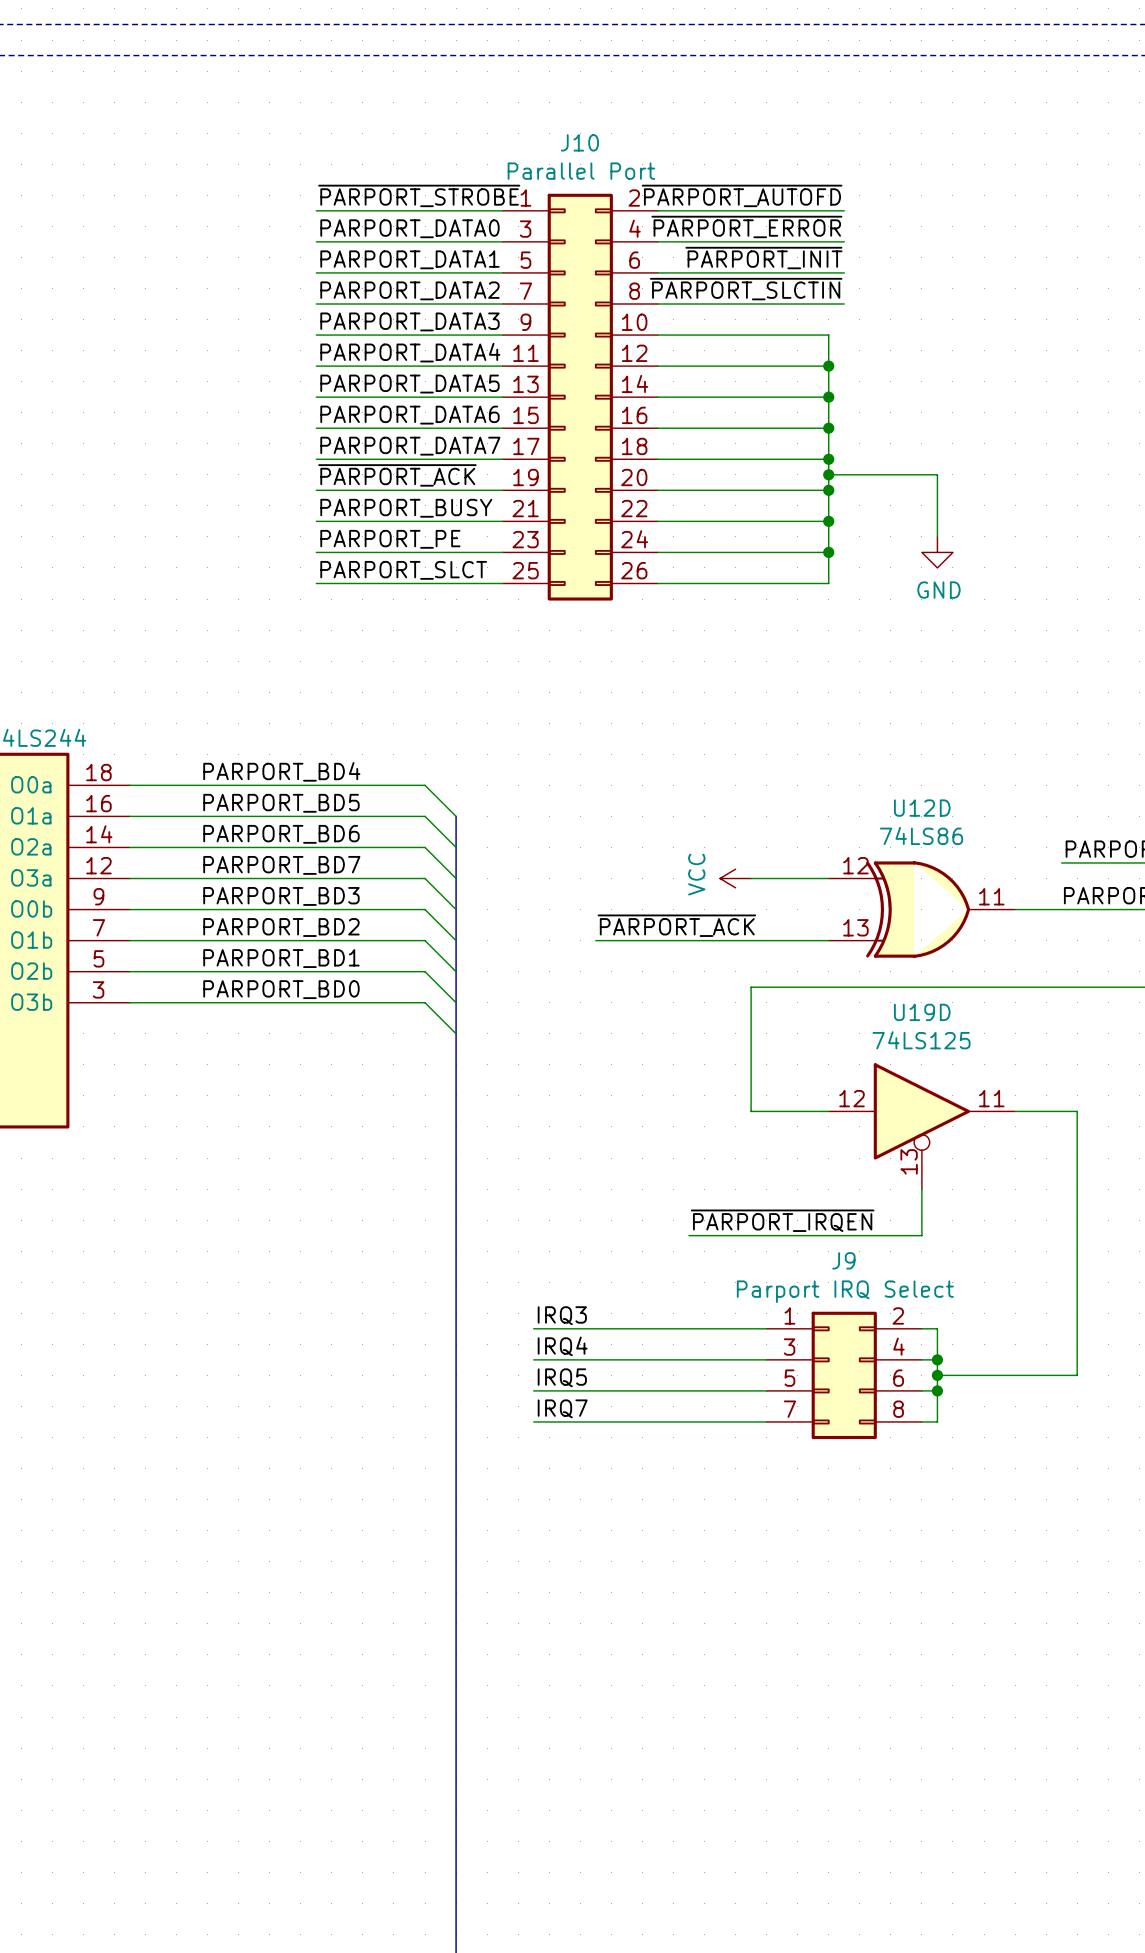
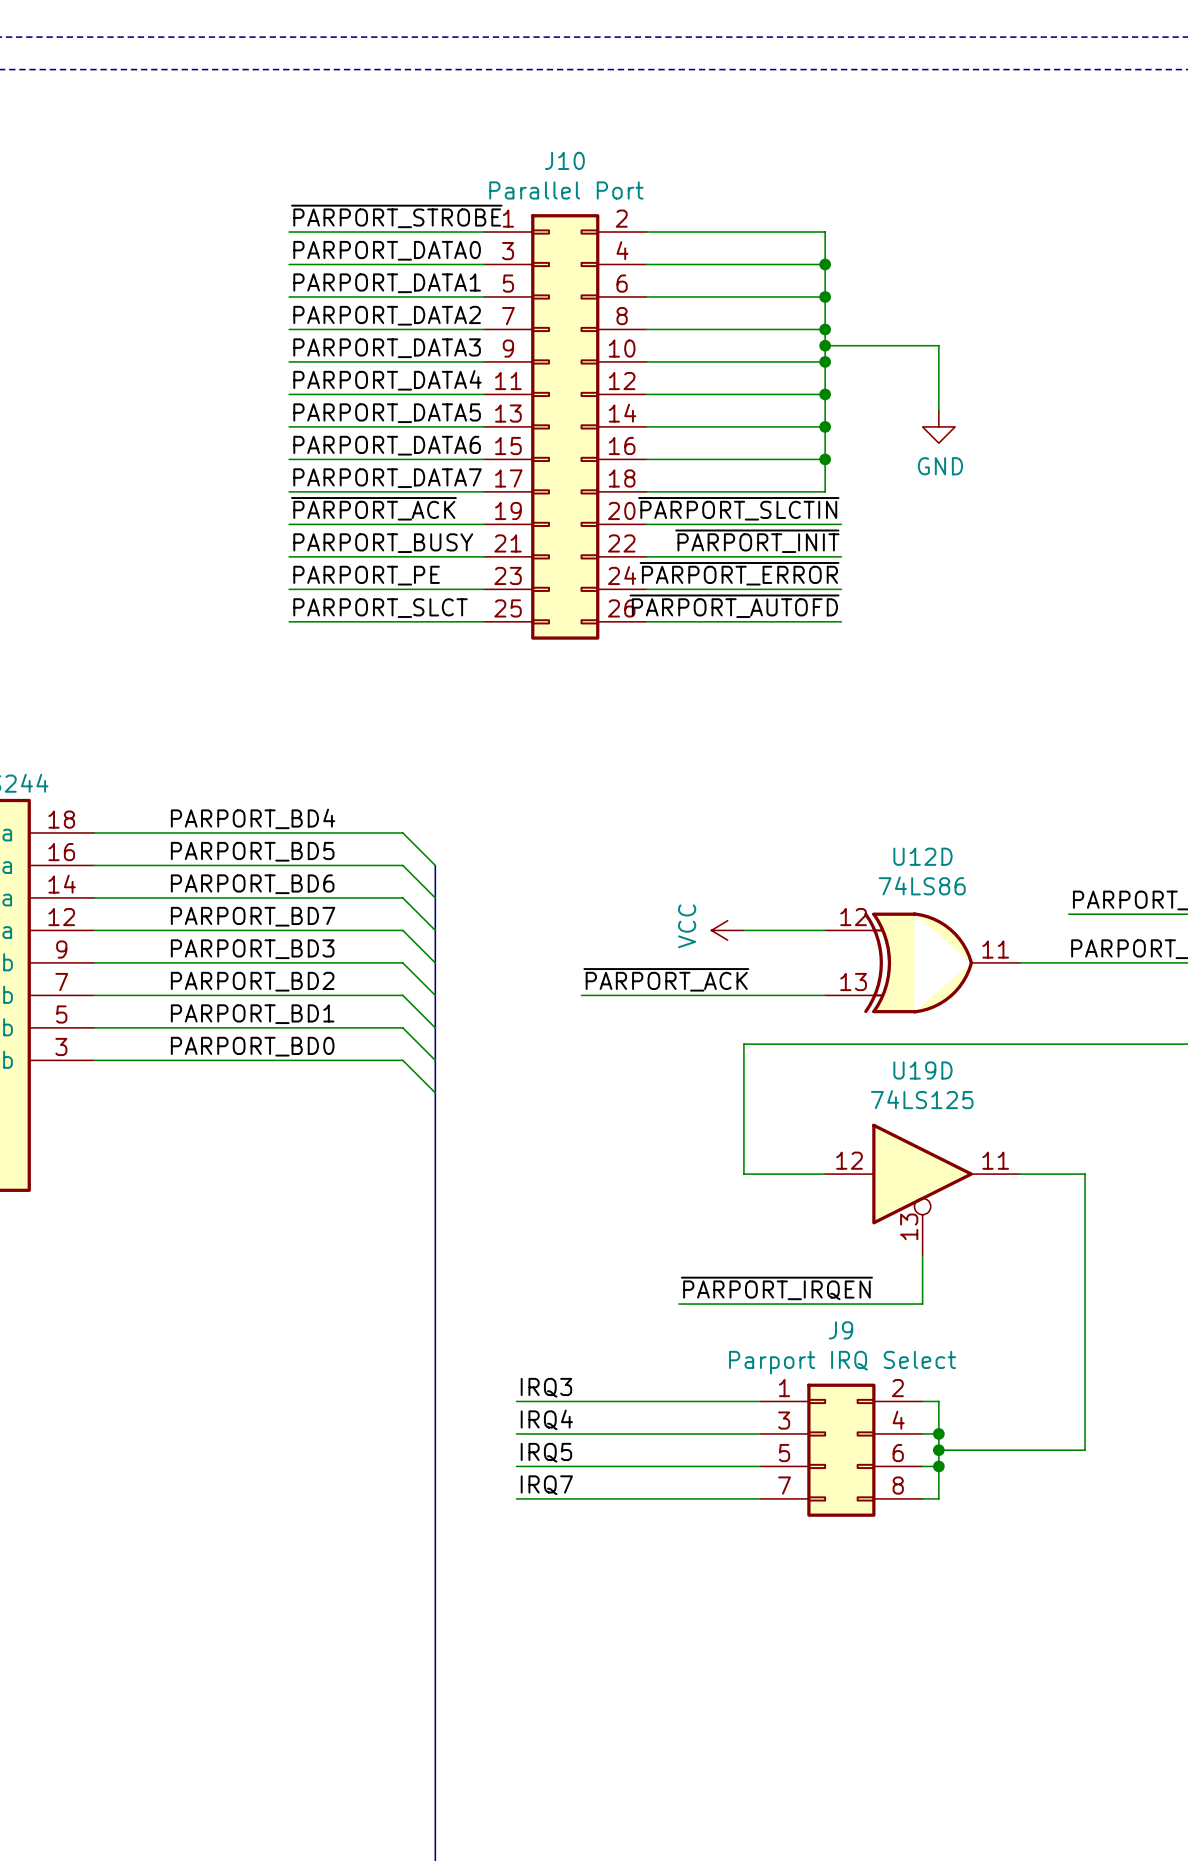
label: ~{PARPORT_AUTOFD} (742, 195) -> none
wire: (828, 210) (844, 210) -> (825, 232) (825, 361)
label: ~{PARPORT_ERROR} (746, 226) -> none
wire: (828, 241) (844, 241) -> (825, 556) (841, 556)
junction: none -> (825, 264)
label position: ~{PARPORT_INIT} (763, 258) -> ~{PARPORT_INIT} (757, 541)
wire: (828, 272) (844, 272) -> (825, 589) (841, 589)
junction: none -> (825, 296)
label position: ~{PARPORT_SLCTIN} (746, 289) -> ~{PARPORT_SLCTIN} (738, 508)
wire: (828, 303) (844, 303) -> (825, 524) (841, 524)
junction: none -> (825, 329)
junction: none -> (825, 345)
junction: none -> (825, 361)
wire: (828, 459) (828, 583) -> (841, 621) (825, 621)
junction: (828, 459) -> none
wire: (828, 474) (937, 474) (937, 536) -> (825, 345) (938, 345) (938, 410)
junction: (828, 474) -> none
junction: (828, 490) -> none
junction: (828, 521) -> none
label: none -> ~{PARPORT_ERROR} (739, 573)
junction: (828, 552) -> none
power symbol position: GND (937, 552) -> GND (938, 426)
label: none -> ~{PARPORT_AUTOFD} (734, 606)

